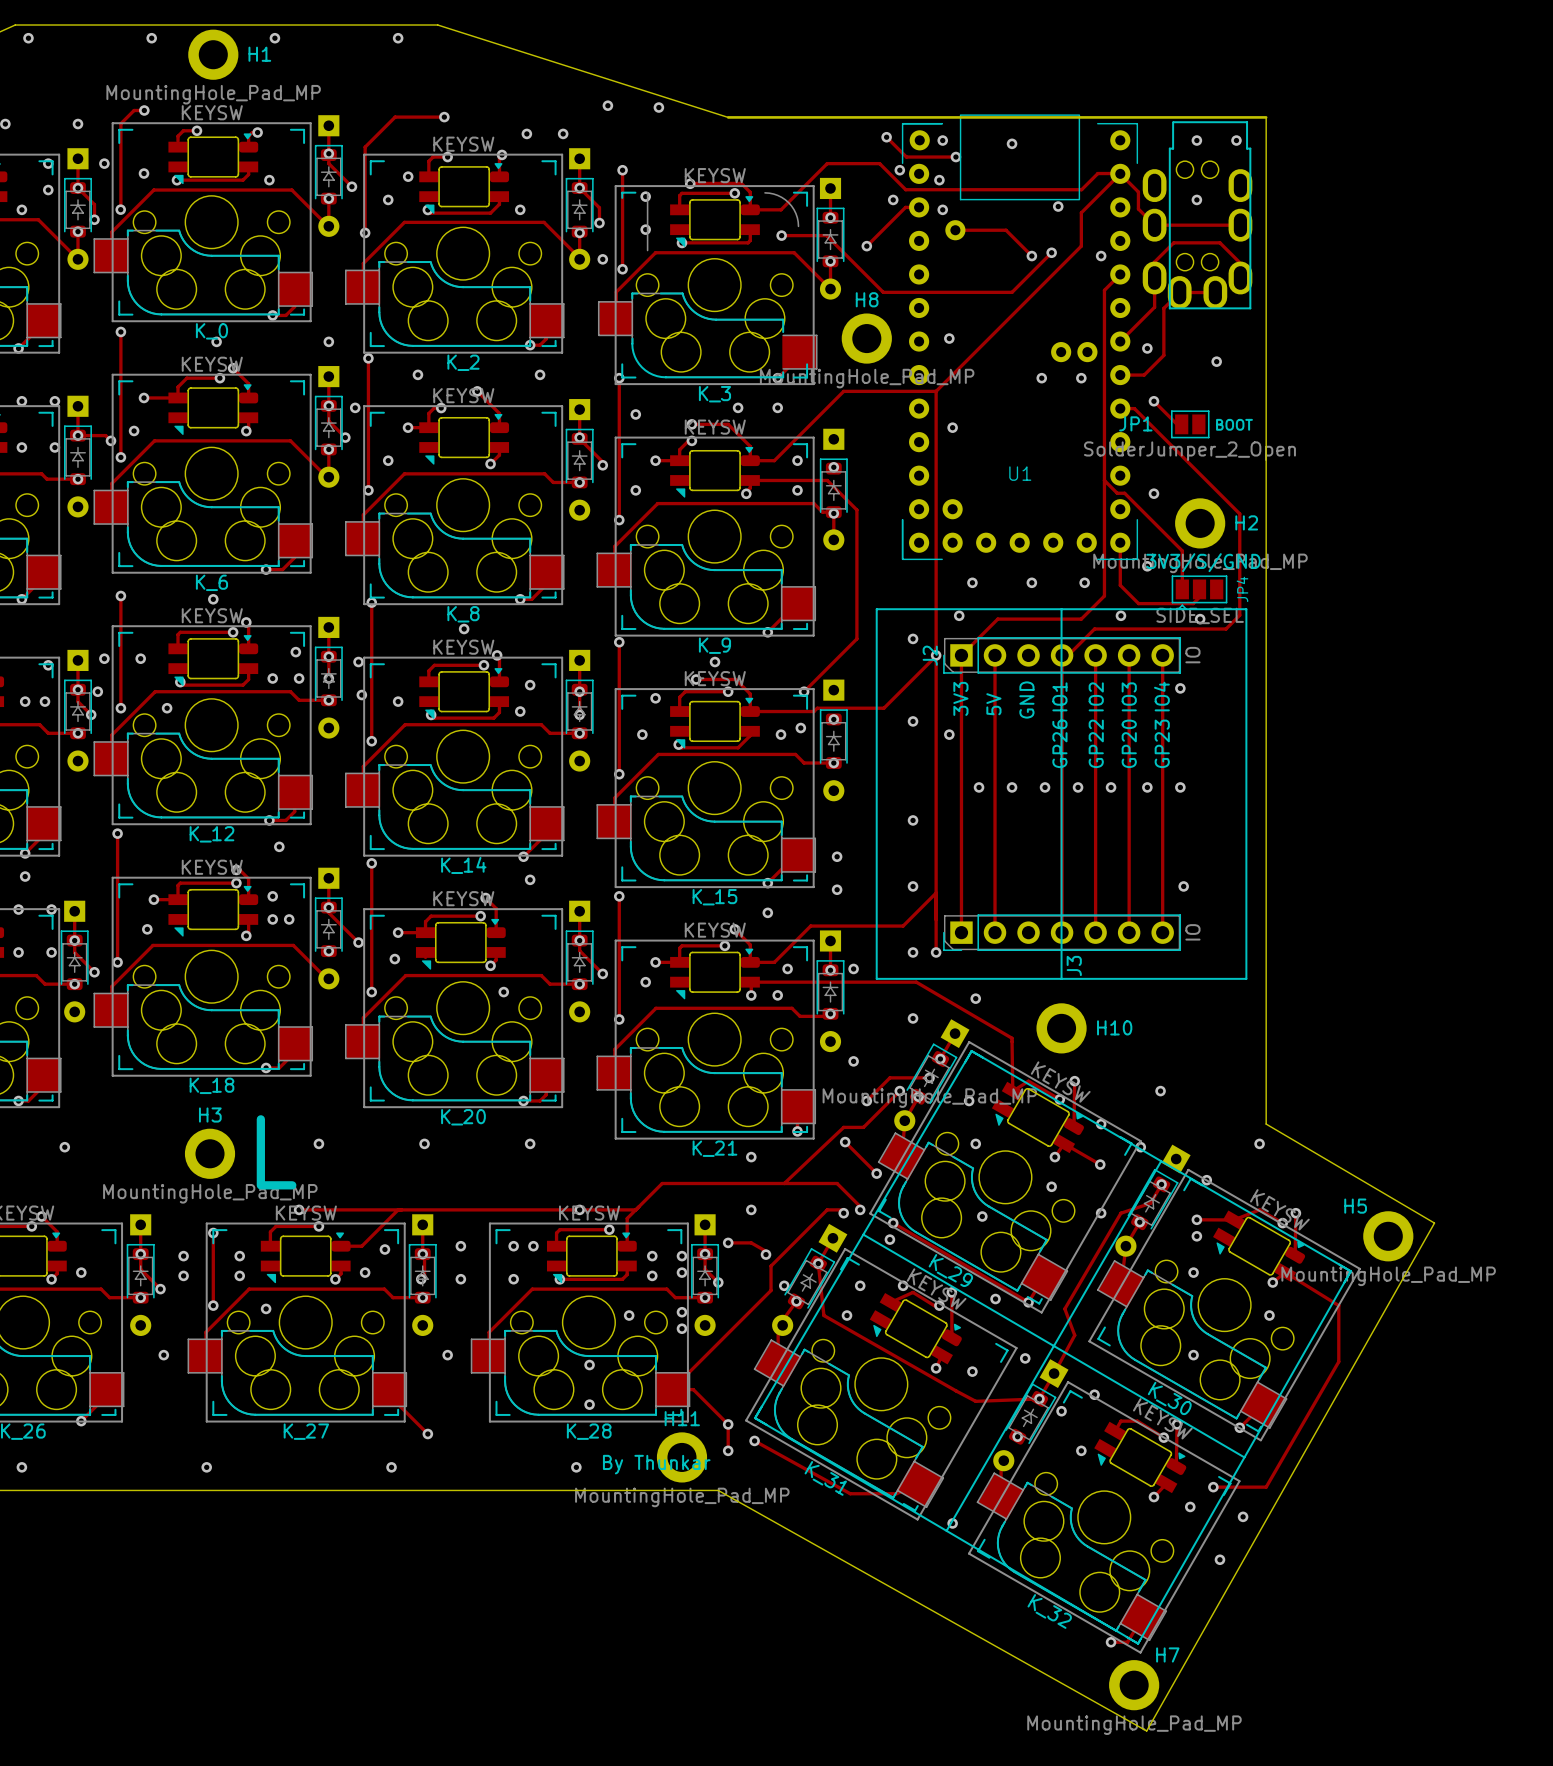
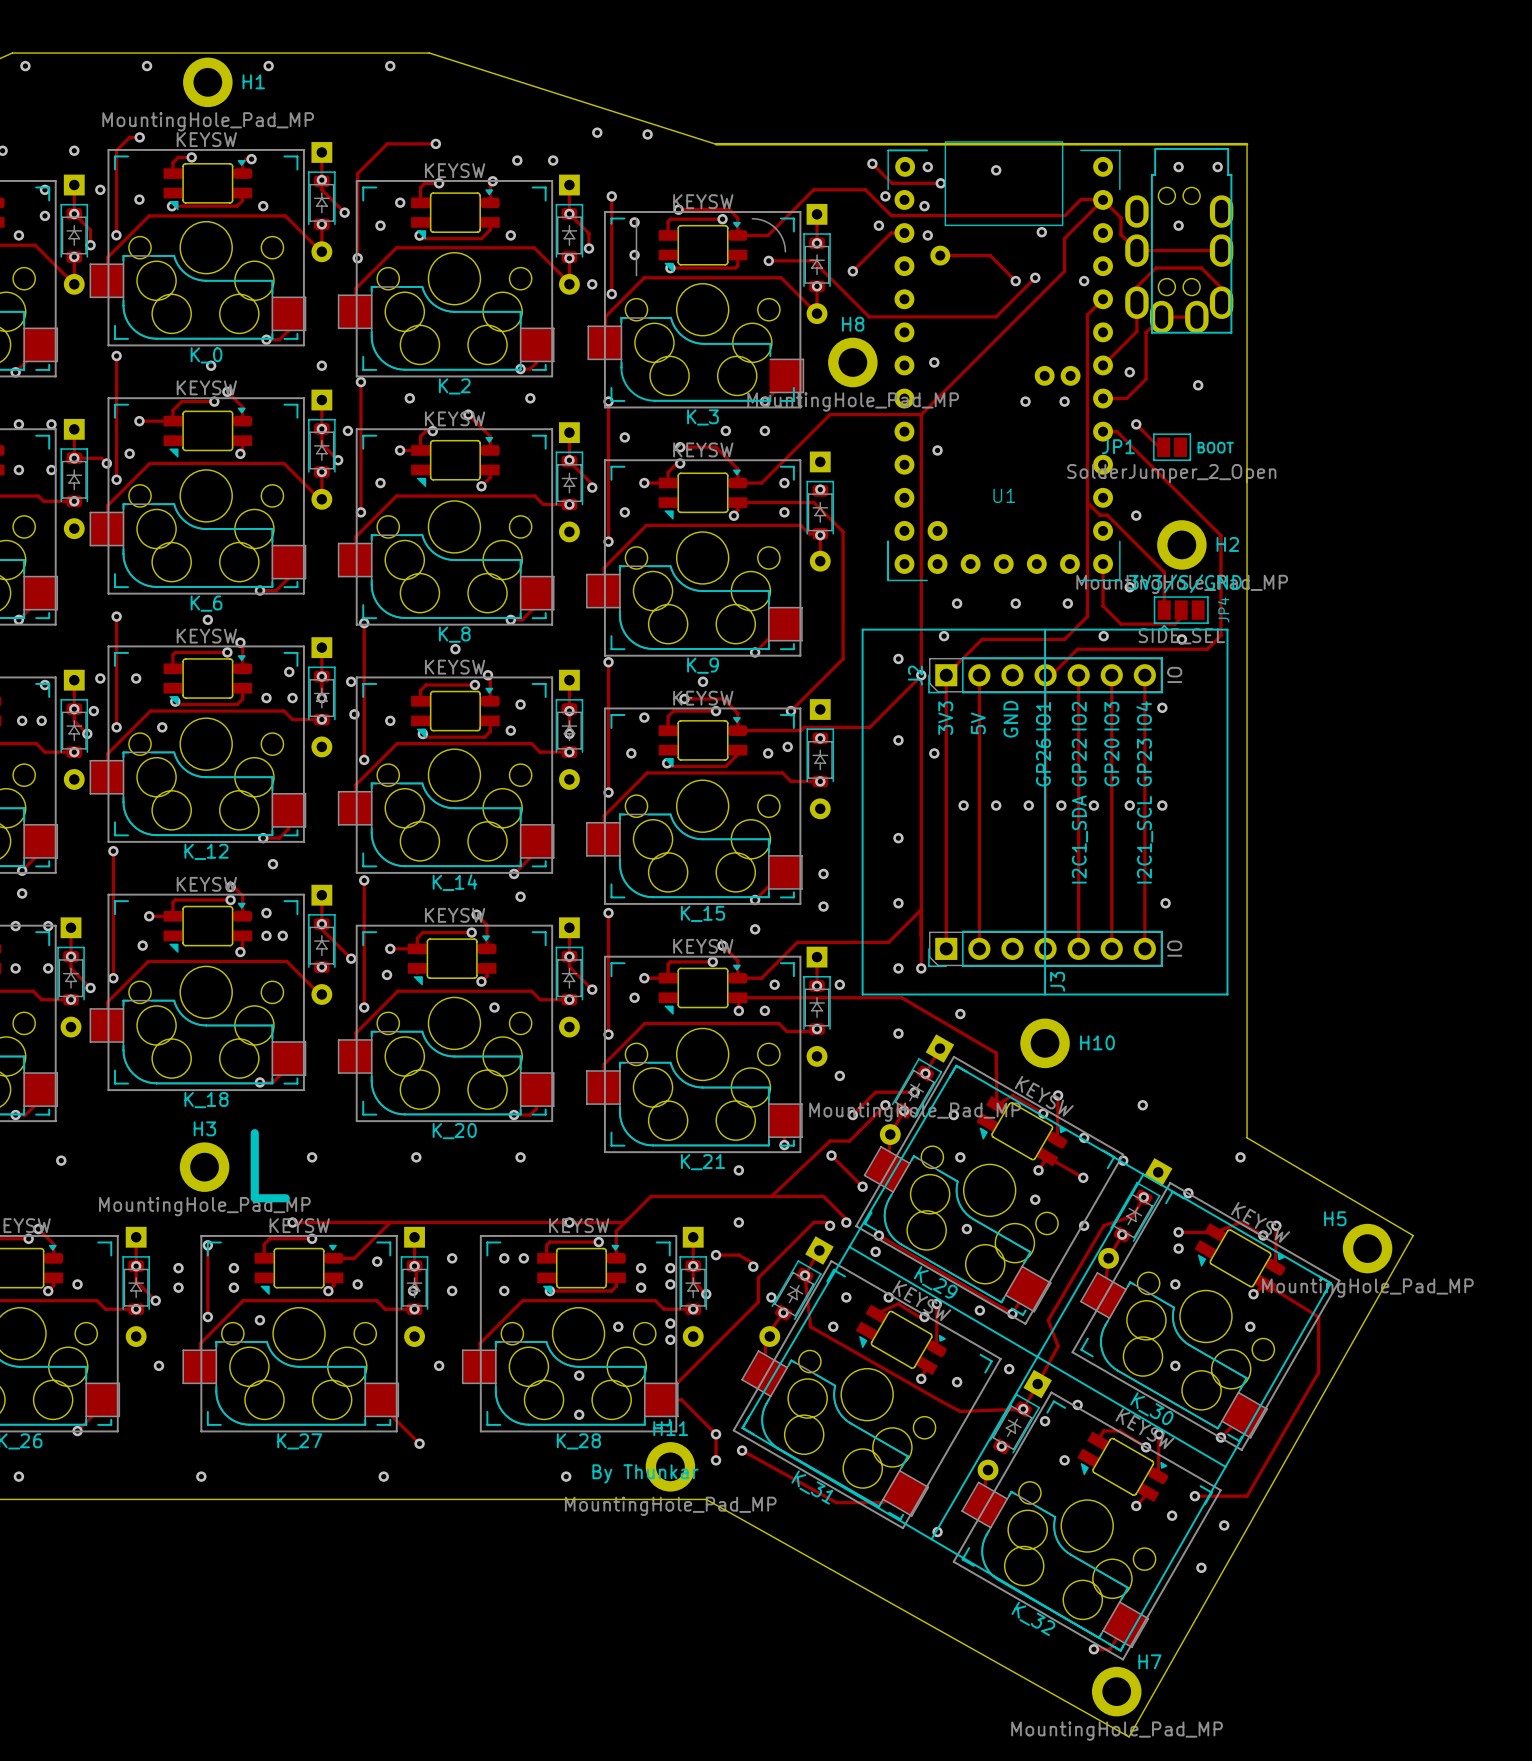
text: none -> I2C1_SDA (1079, 839)
text: none -> I2C1_SCL (1145, 839)

